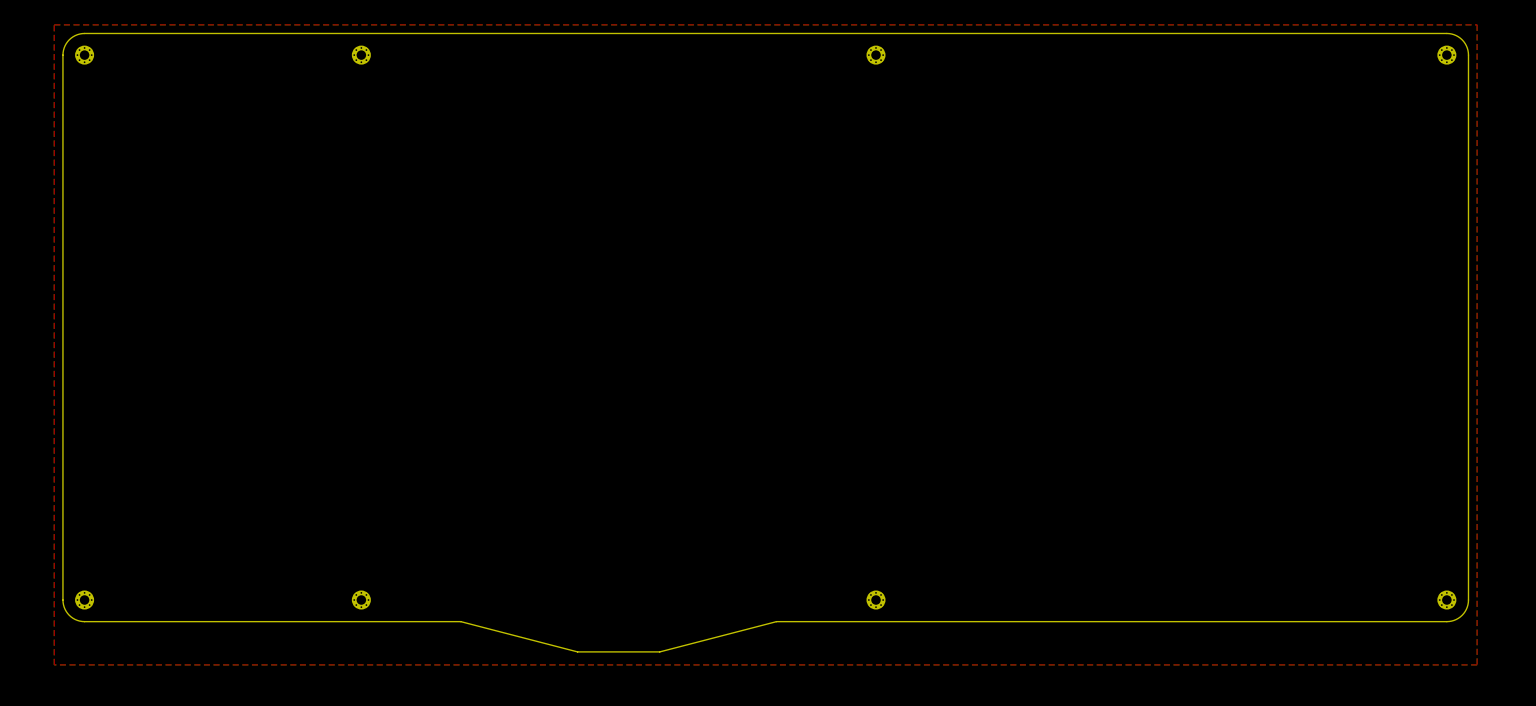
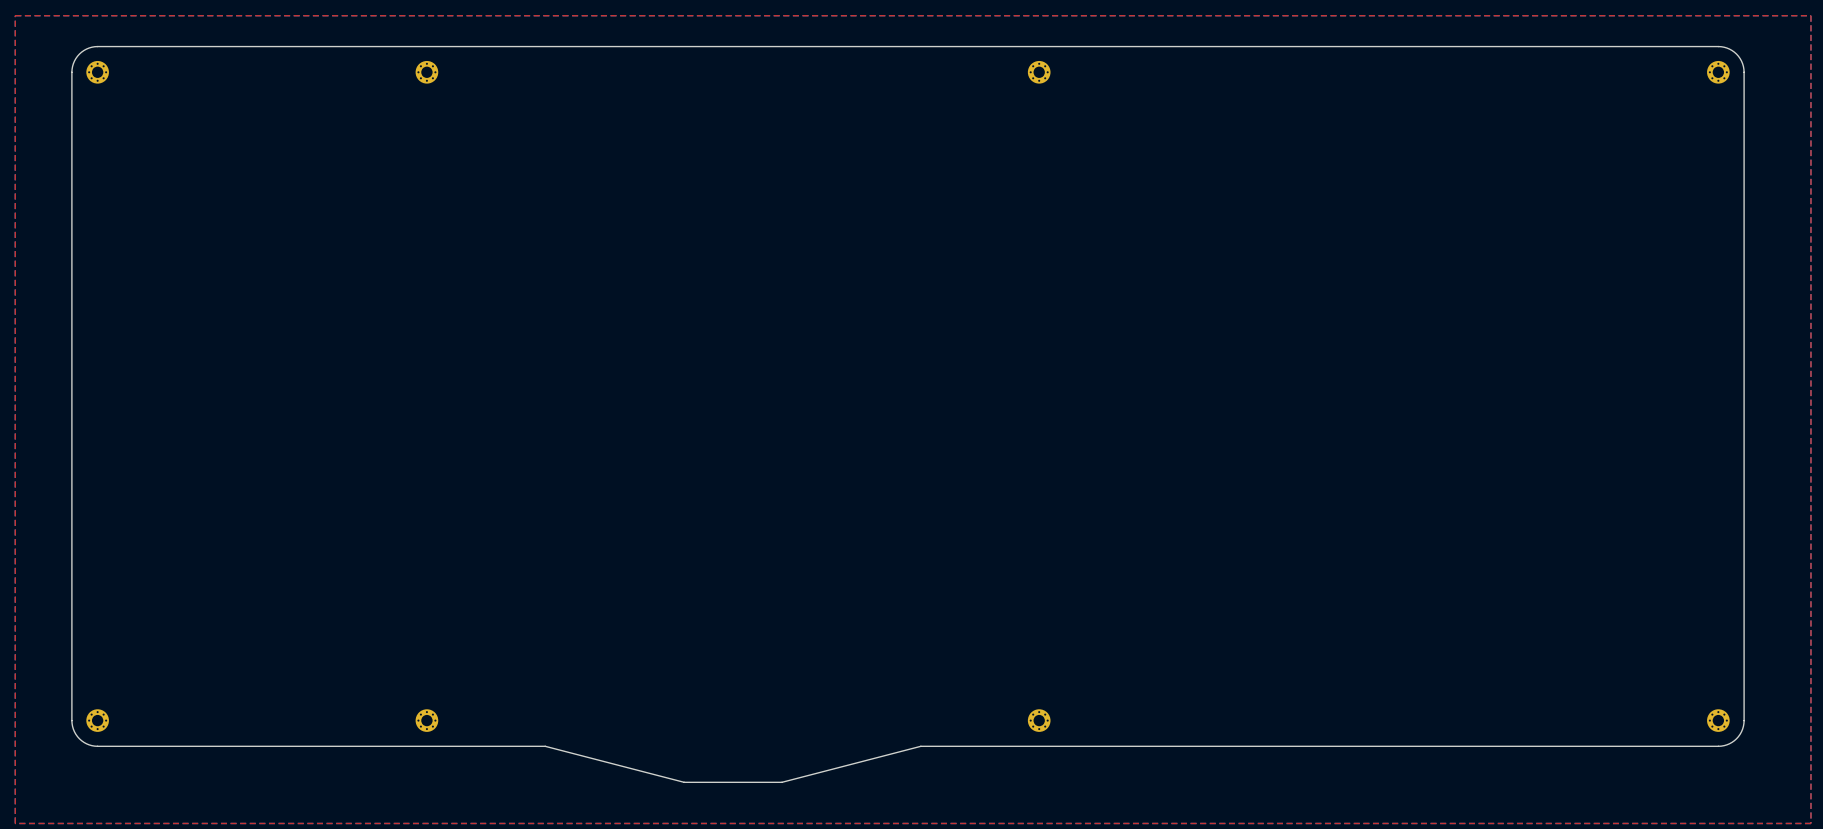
top zone outline: (54, 24) (54, 664) (1477, 664) (1477, 24) (54, 24) -> (15, 15) (15, 823) (1810, 823) (1810, 15) (15, 15)

